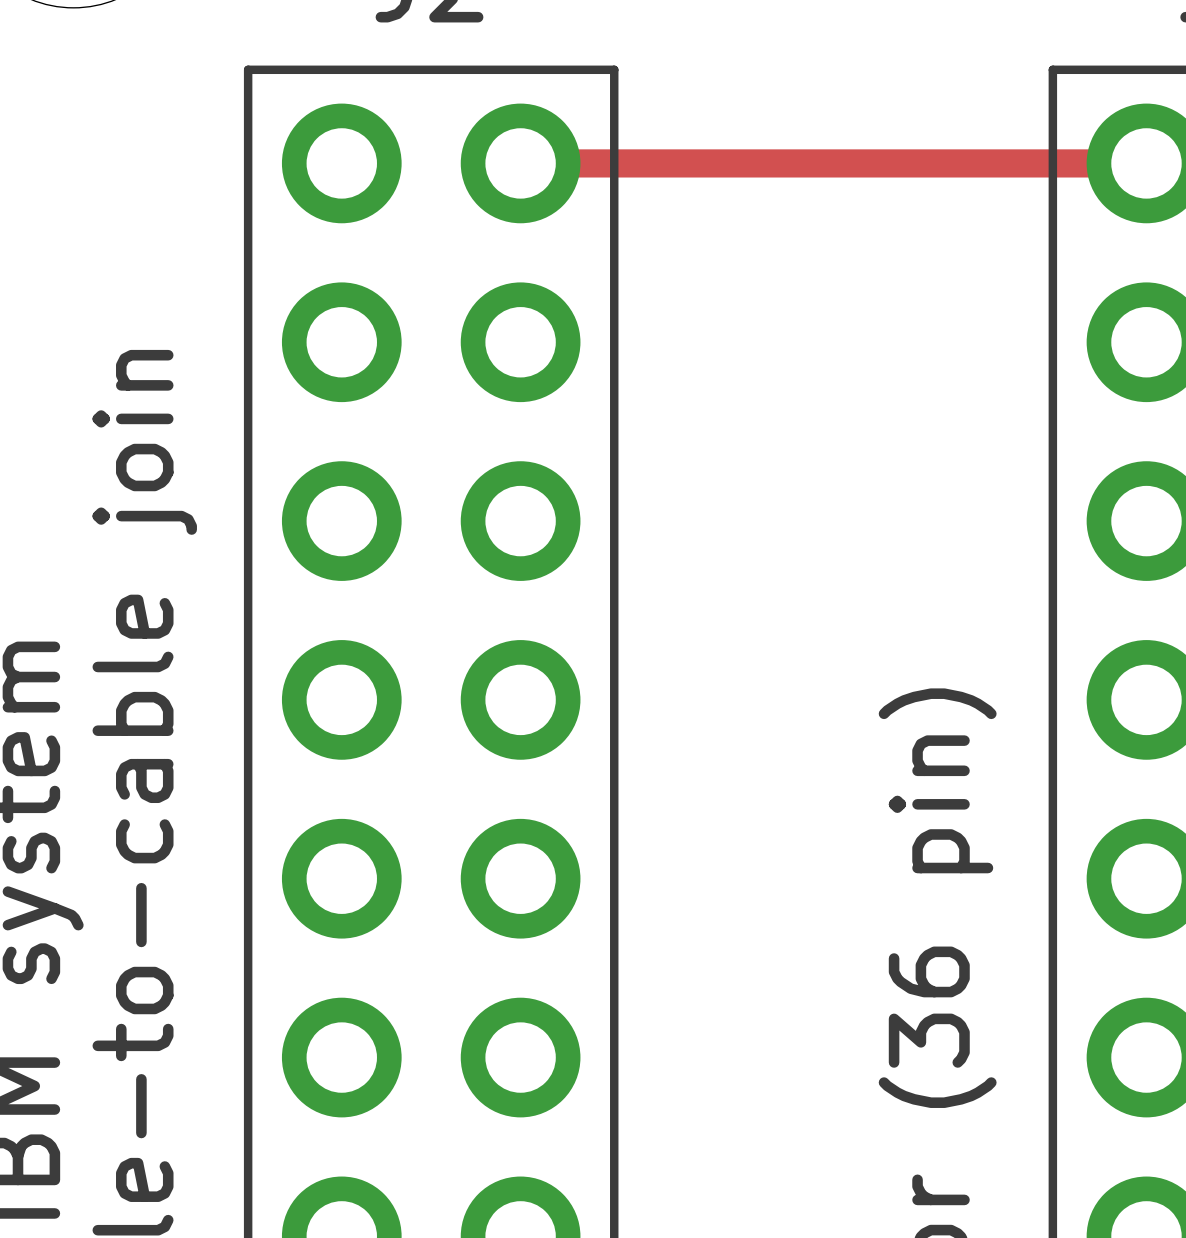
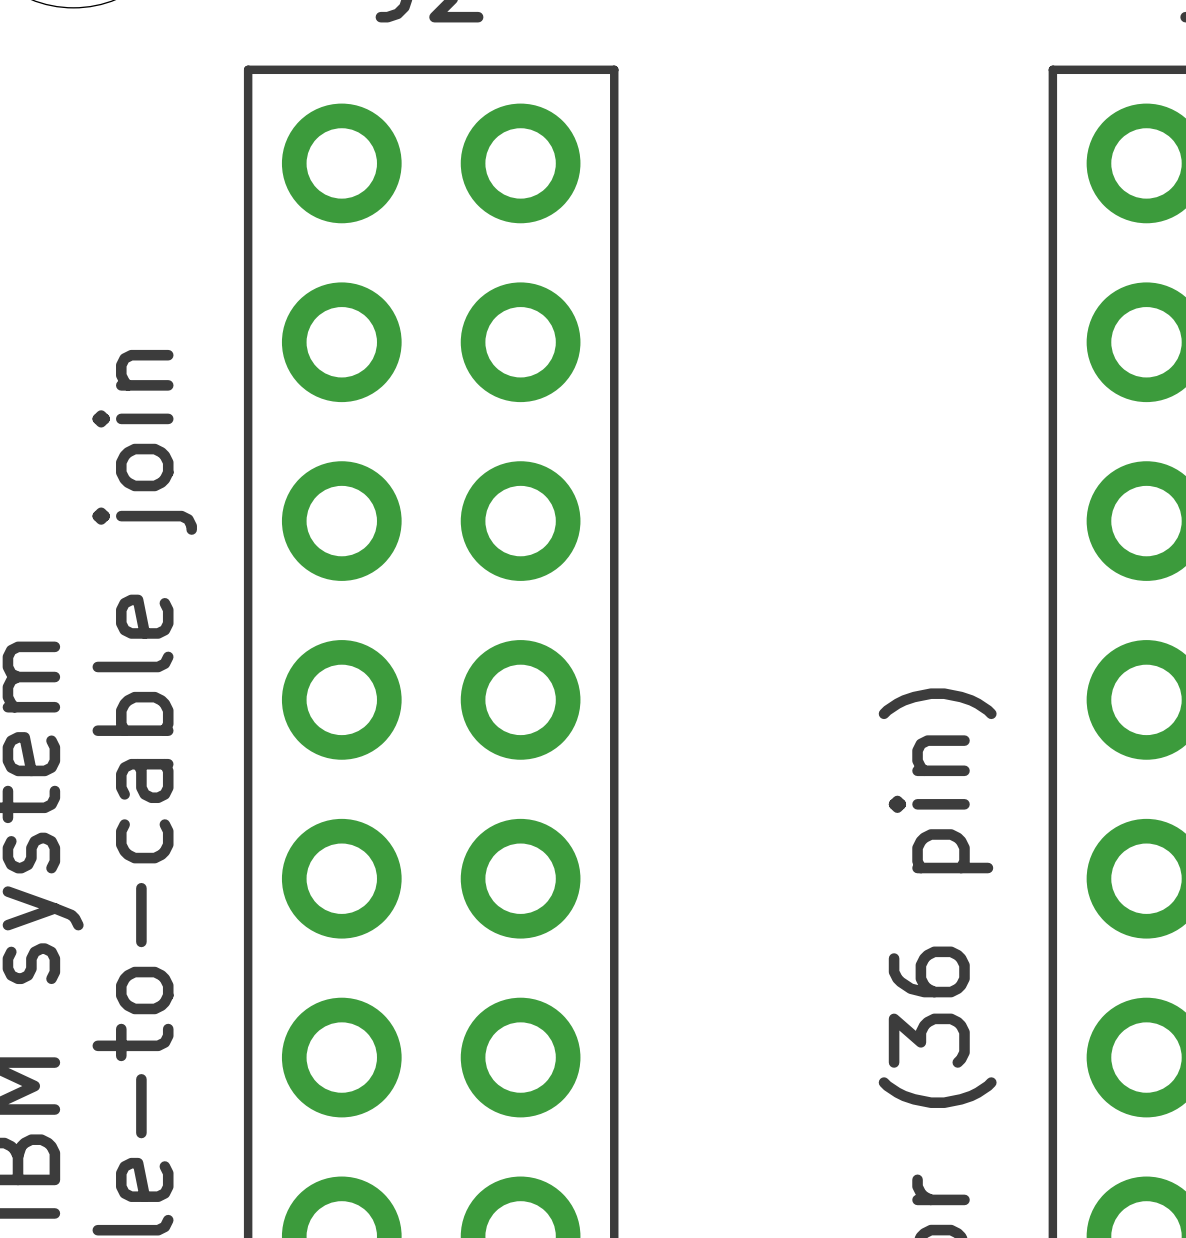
track: (520, 163) (1146, 163) -> none

